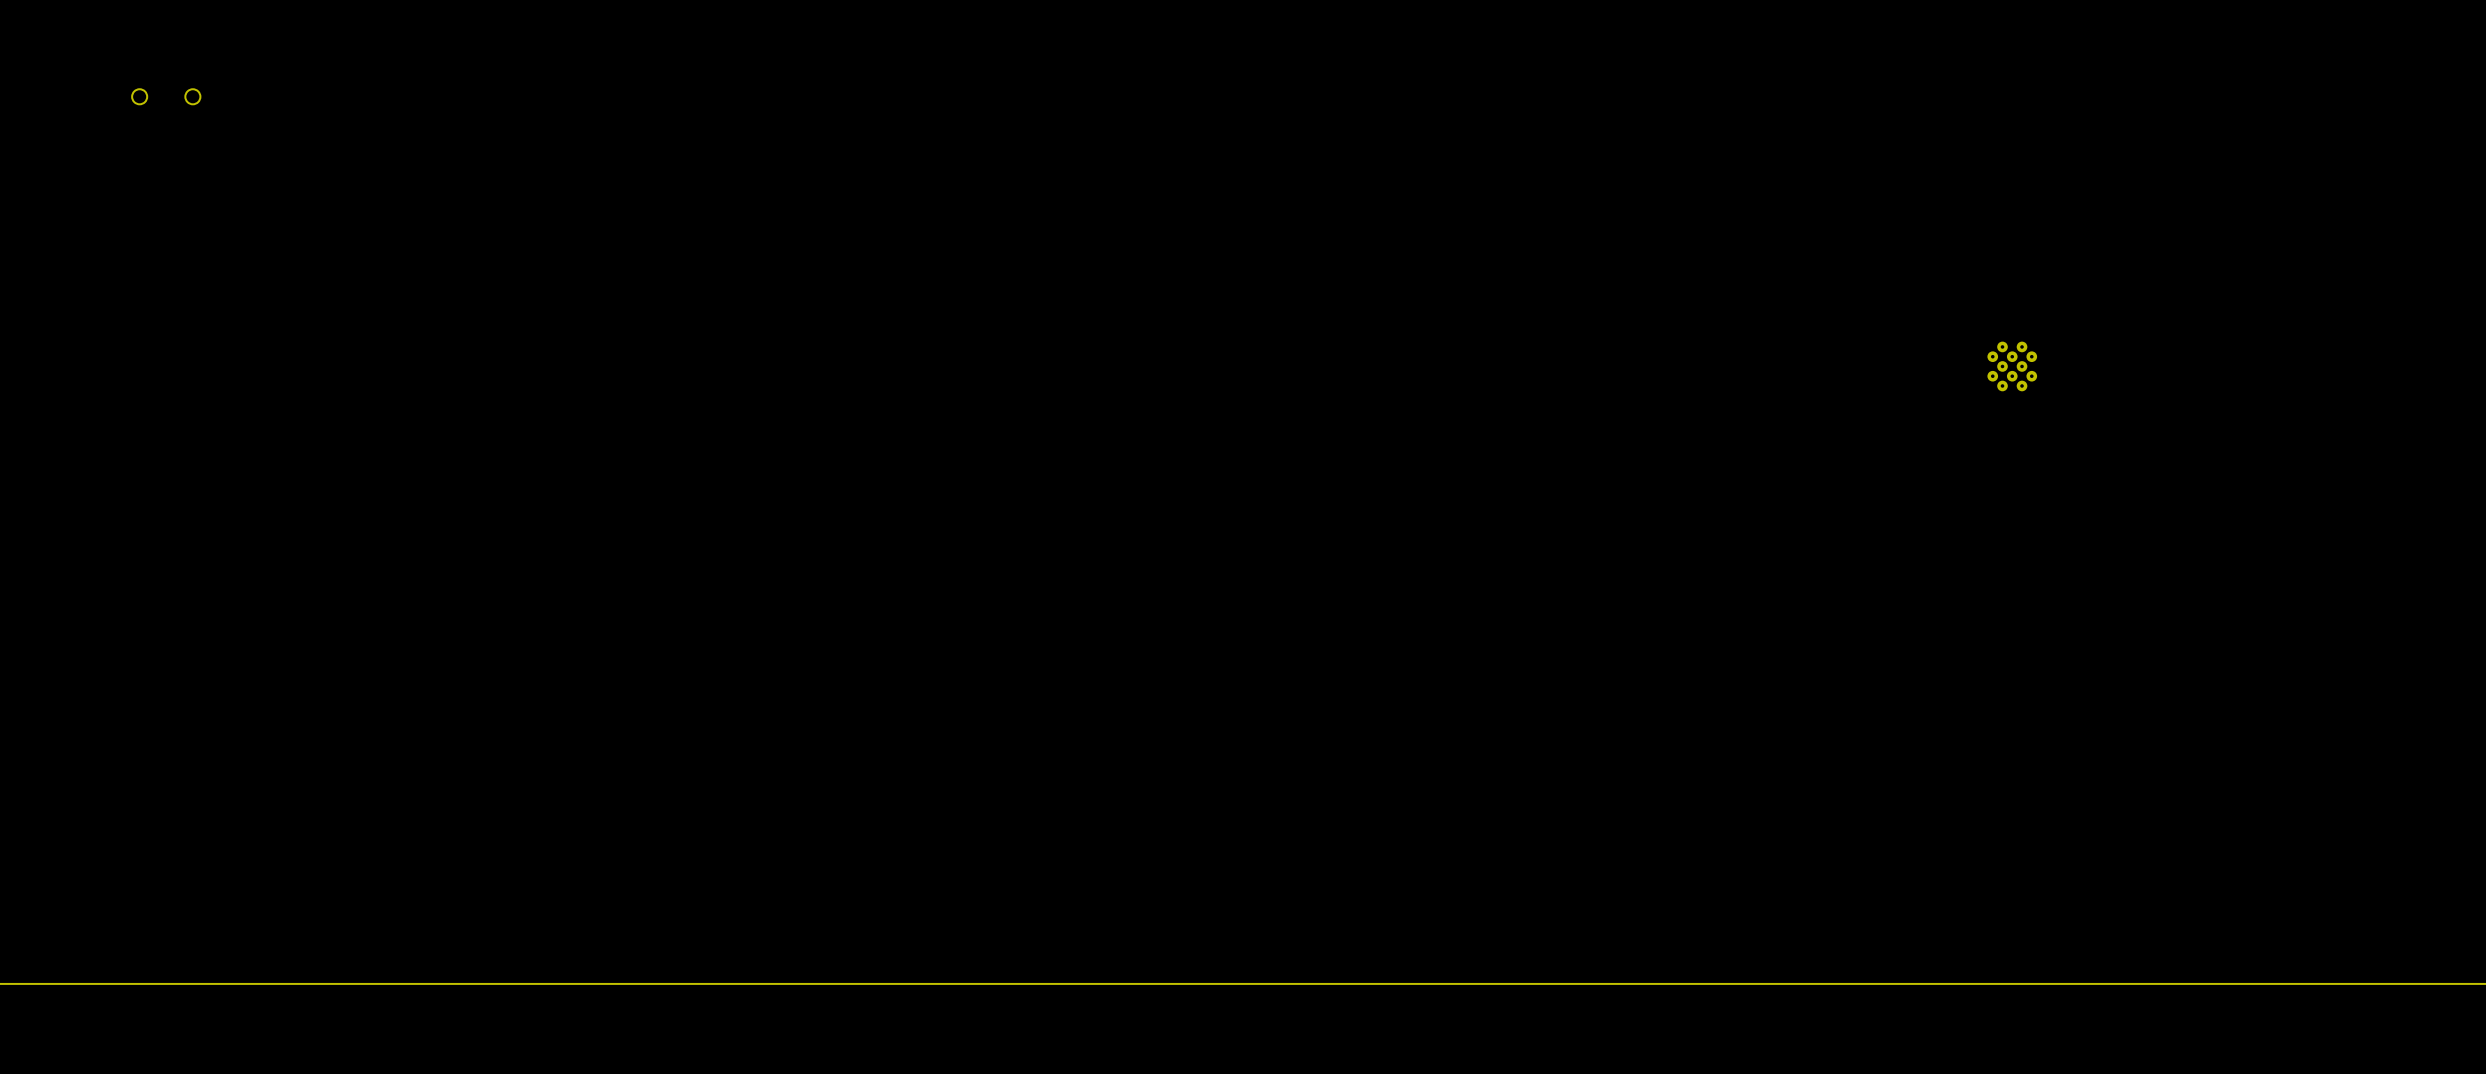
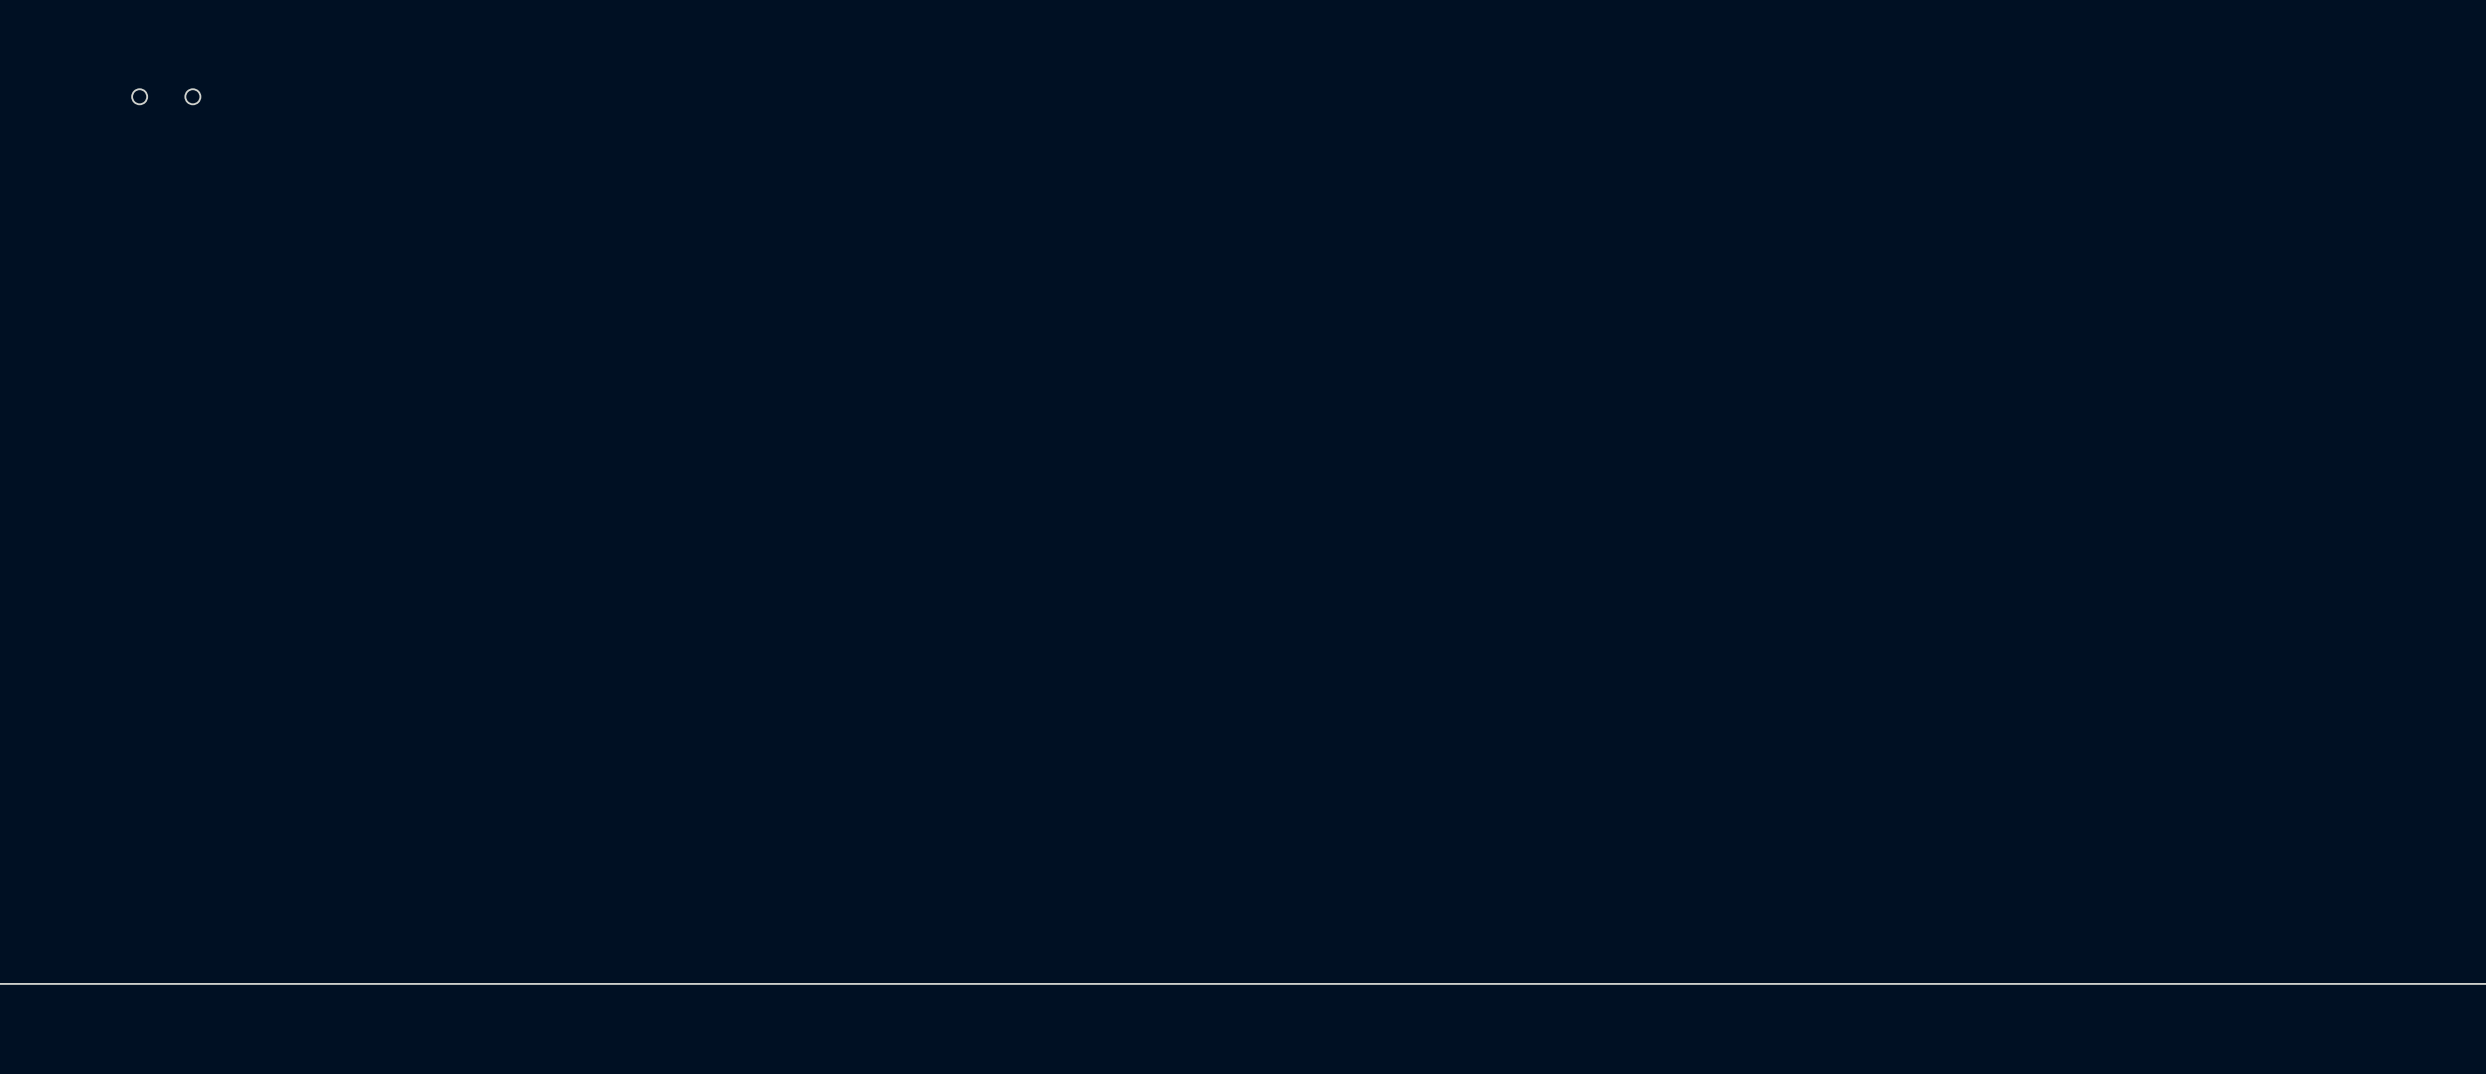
part: (2012, 366) -> none

